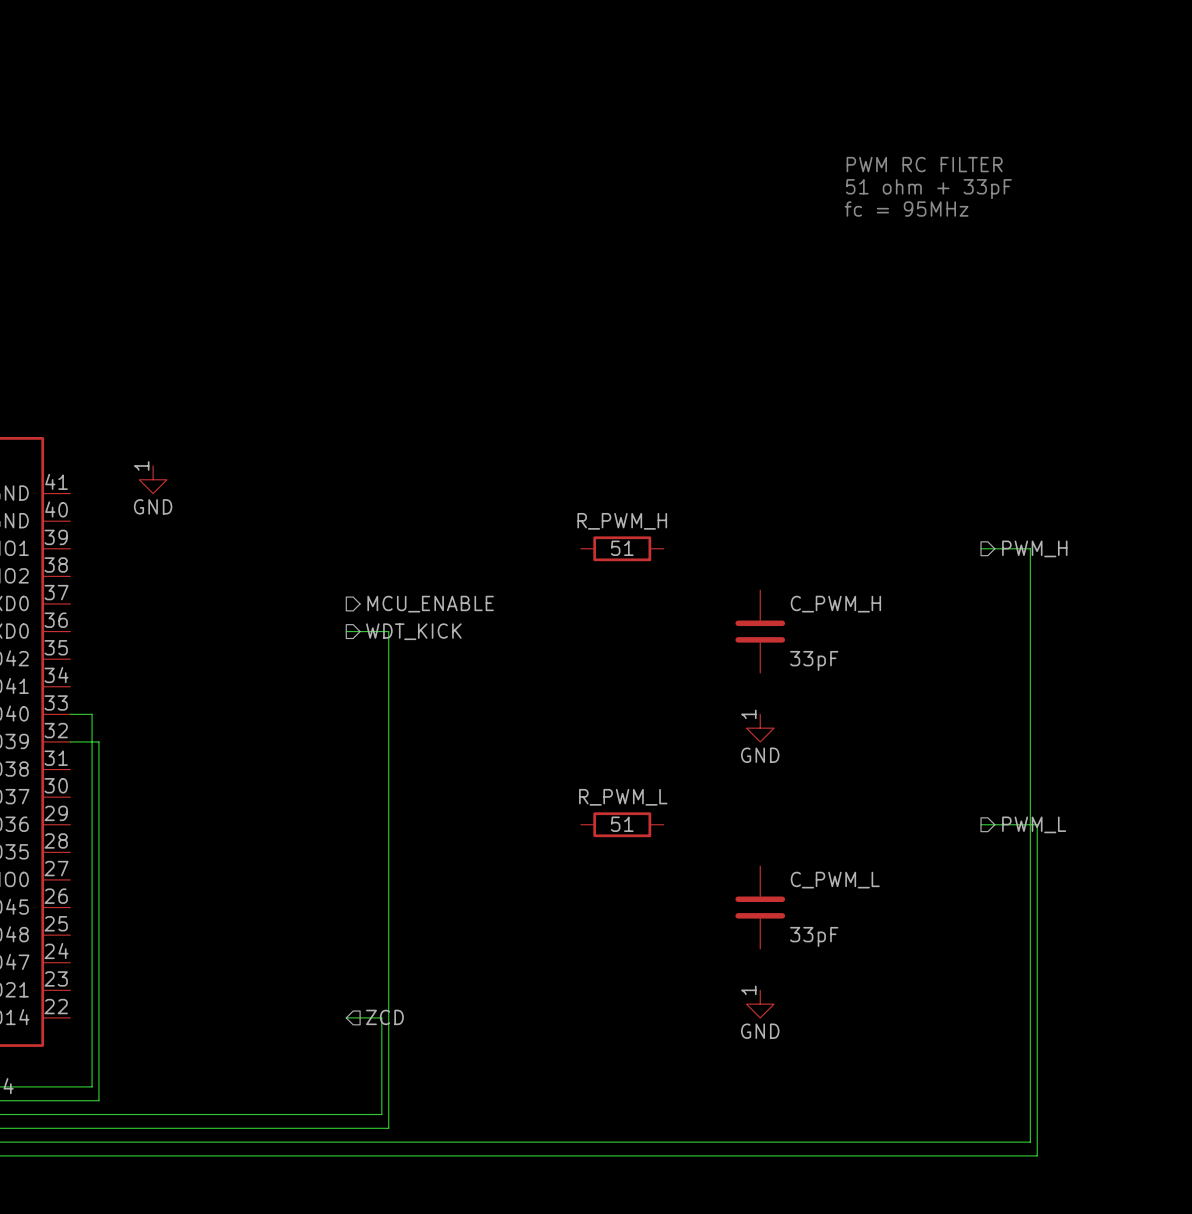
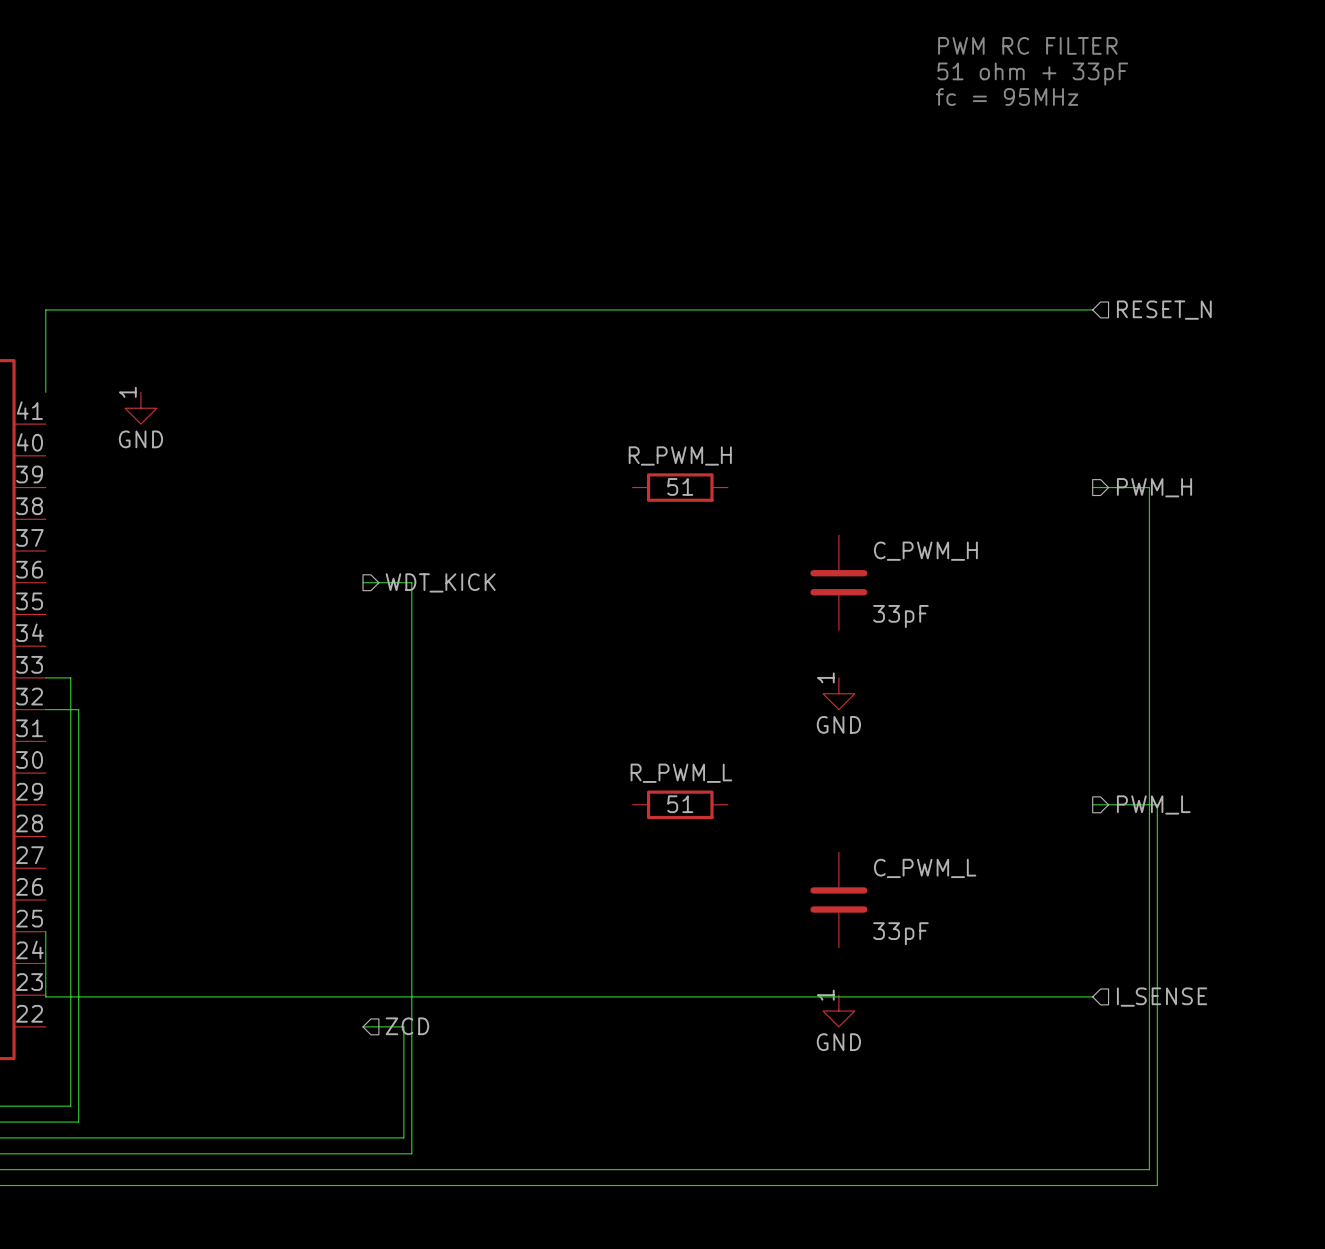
wire: none -> (1092, 309) (45, 309) (45, 392)
hierarchical label: none -> RESET_N (1164, 310)
hierarchical label: MCU_ENABLE (430, 604) -> none
wire: none -> (45, 931) (45, 996) (1092, 996)
hierarchical label: none -> I_SENSE (1162, 997)

